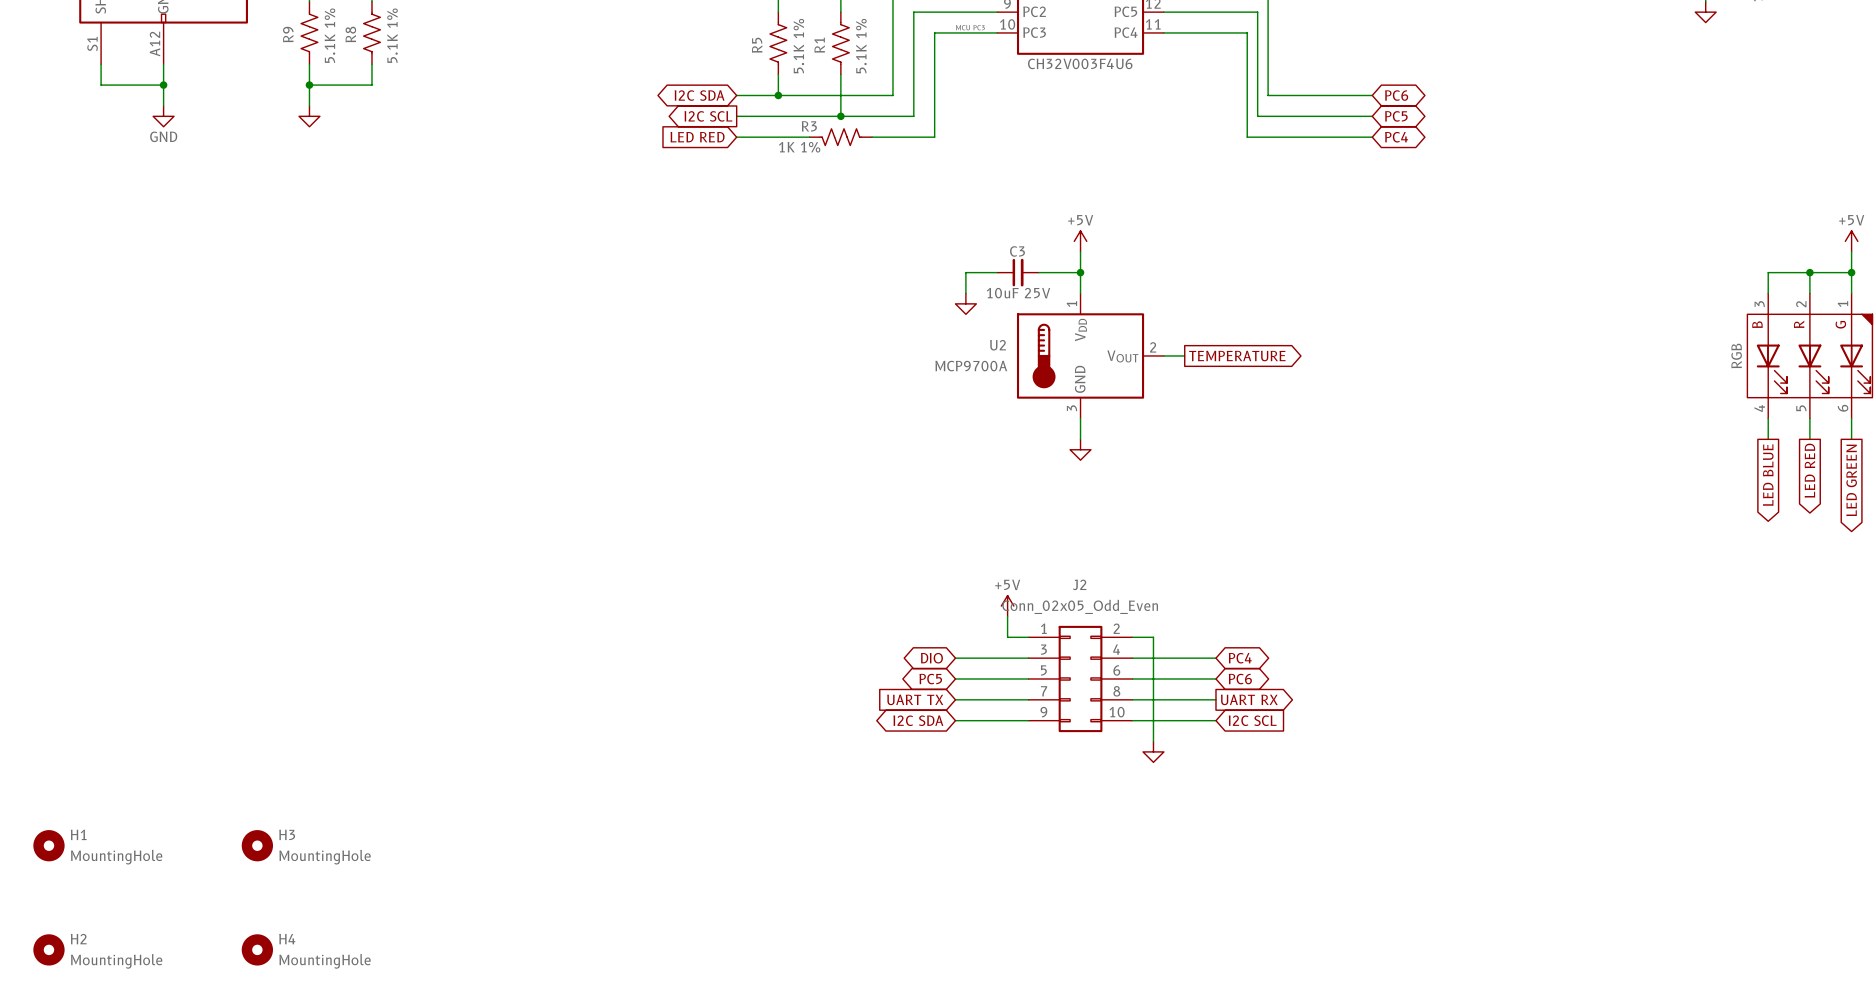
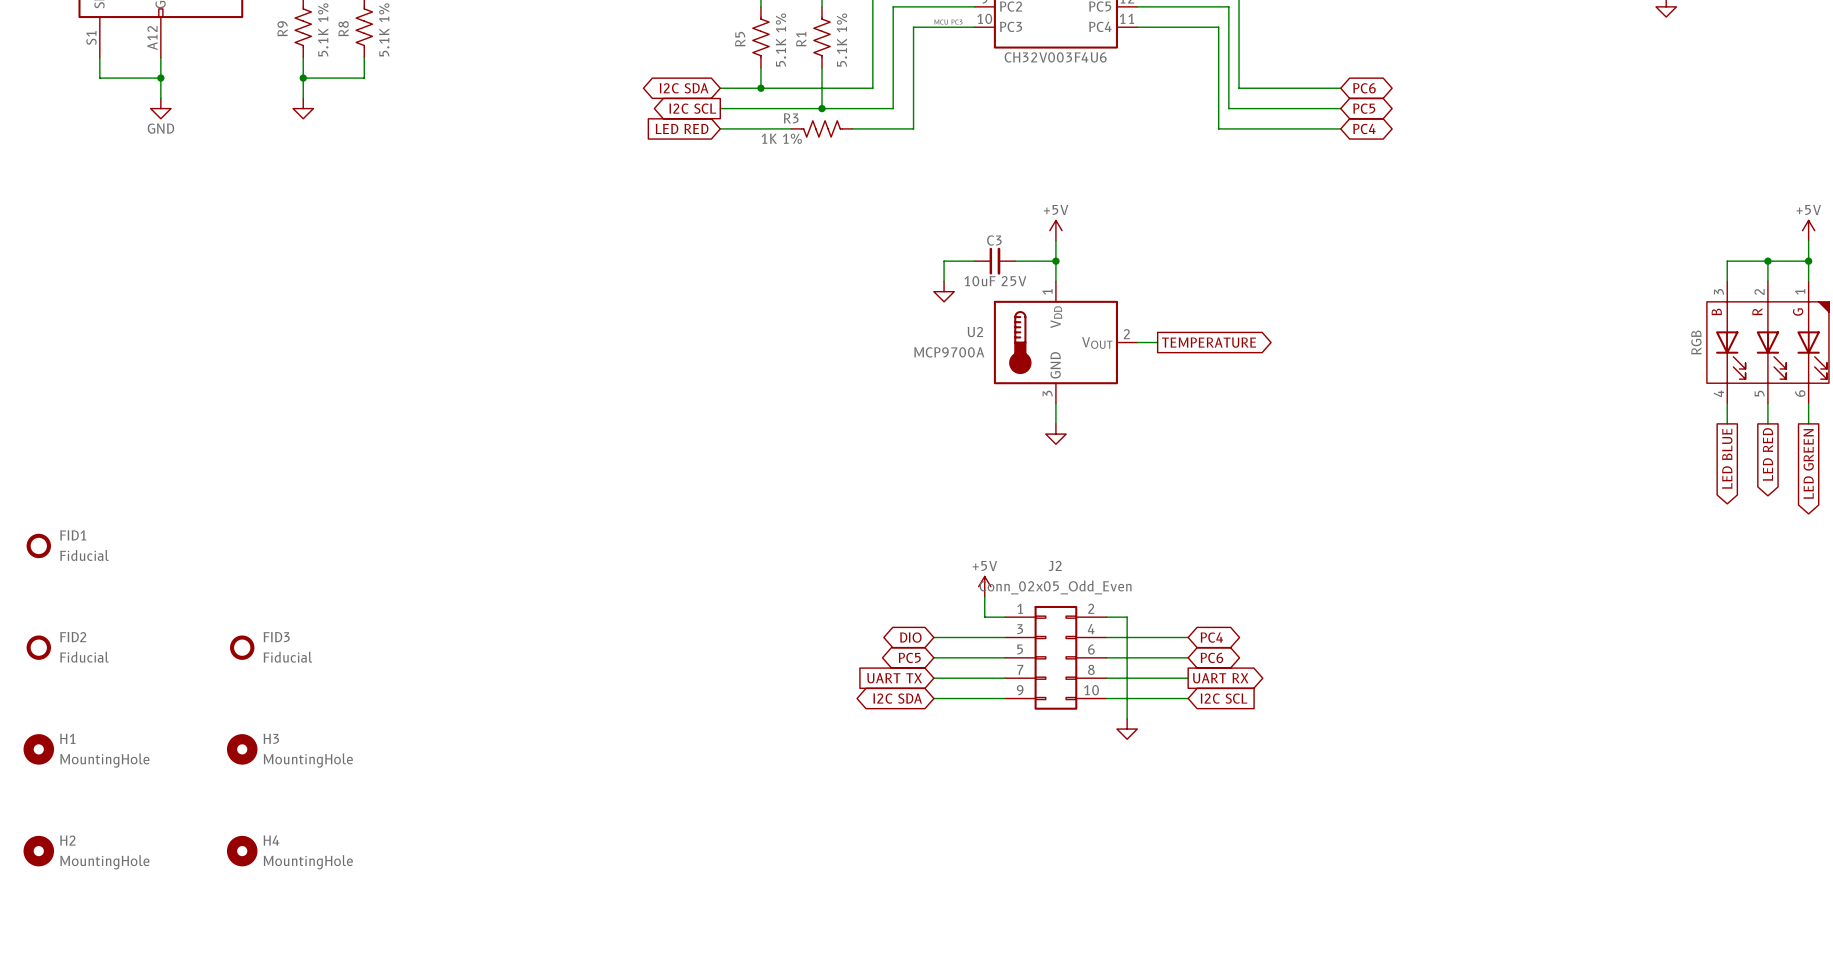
FID1: none -> Fiducial (38, 545)
FID2: none -> Fiducial (38, 647)
FID3: none -> Fiducial (242, 647)
H1 position: (48, 845) -> (38, 749)
H3 position: (257, 845) -> (242, 749)
H2 position: (48, 949) -> (38, 851)
H4 position: (257, 949) -> (242, 851)

